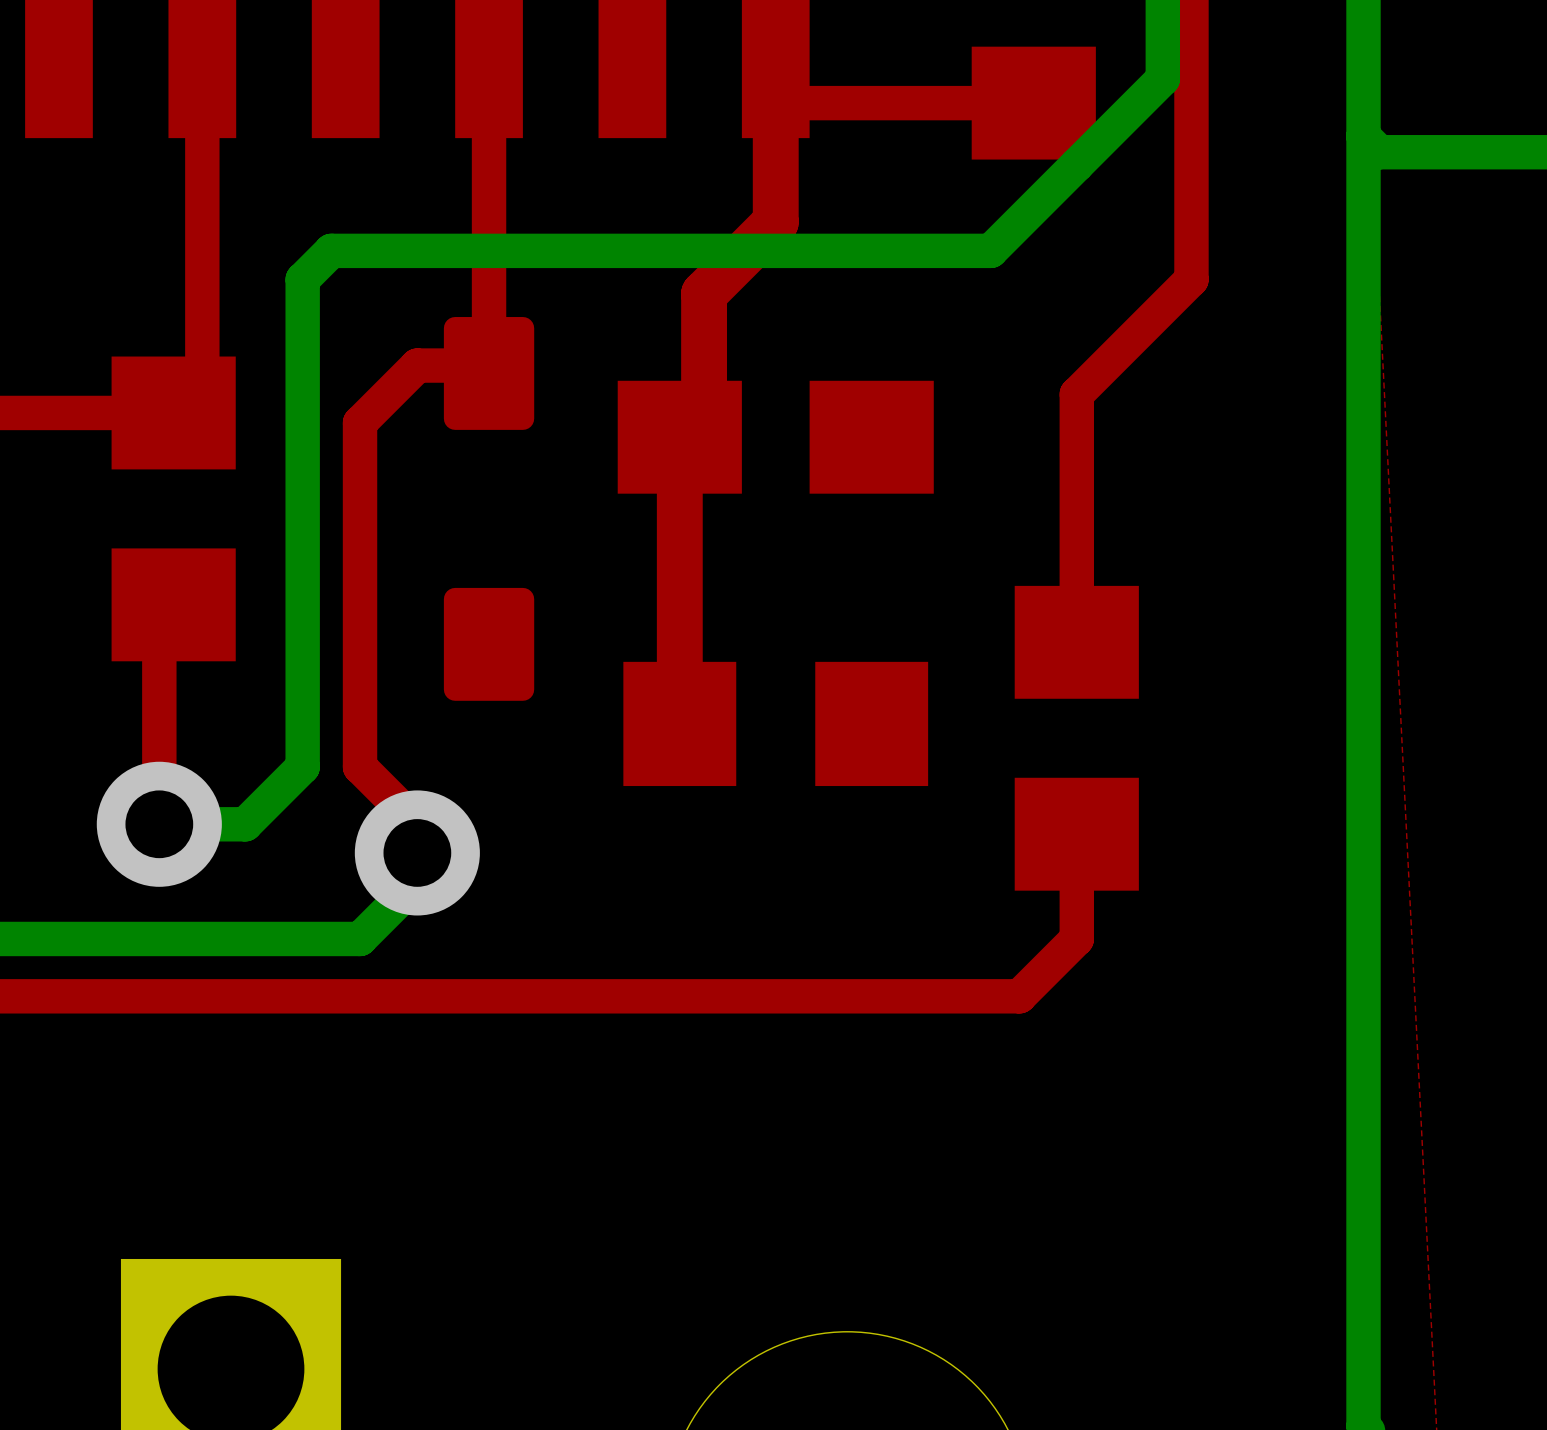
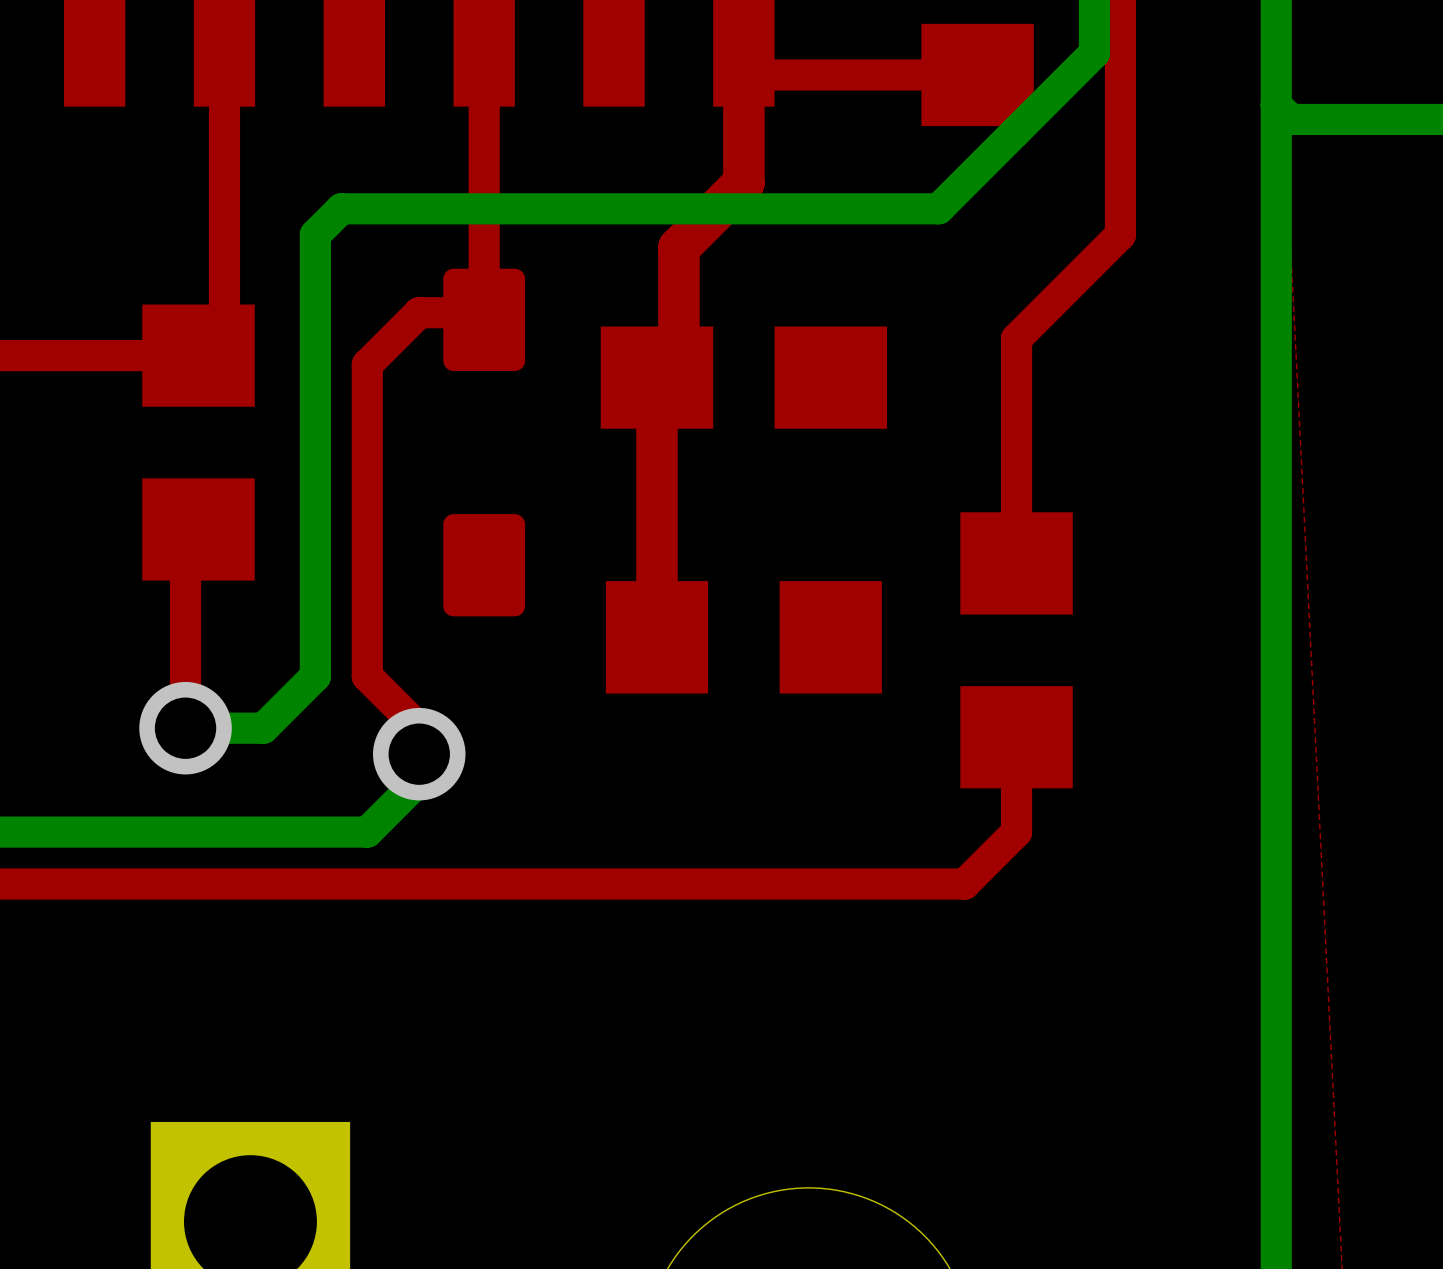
via size: [96, 761, 222, 887] -> [139, 681, 232, 775]
via size: [354, 790, 480, 916] -> [373, 707, 466, 801]

